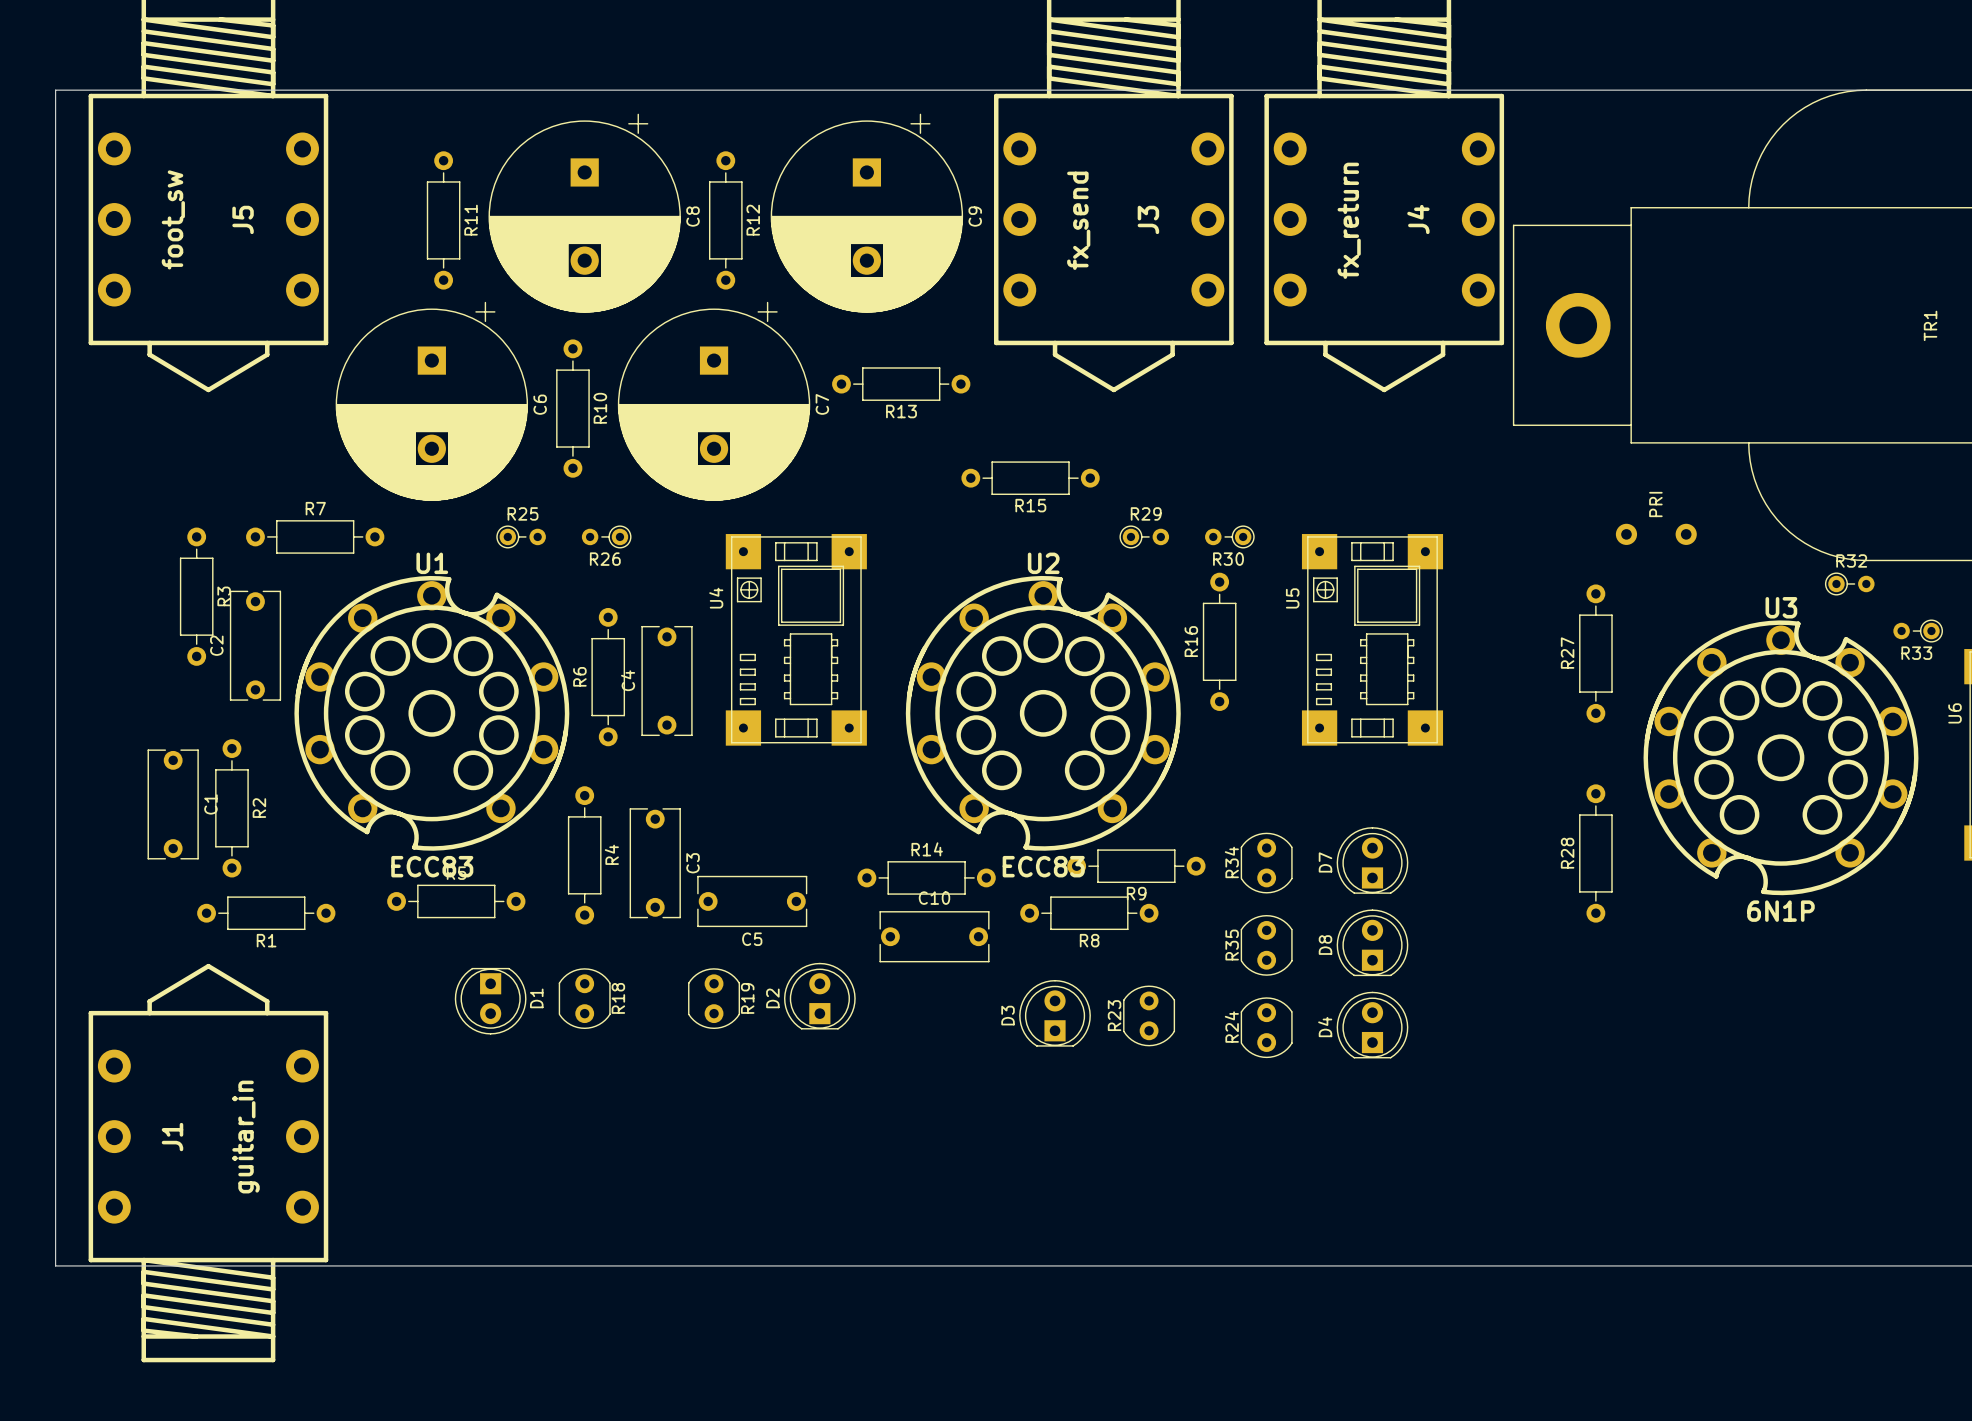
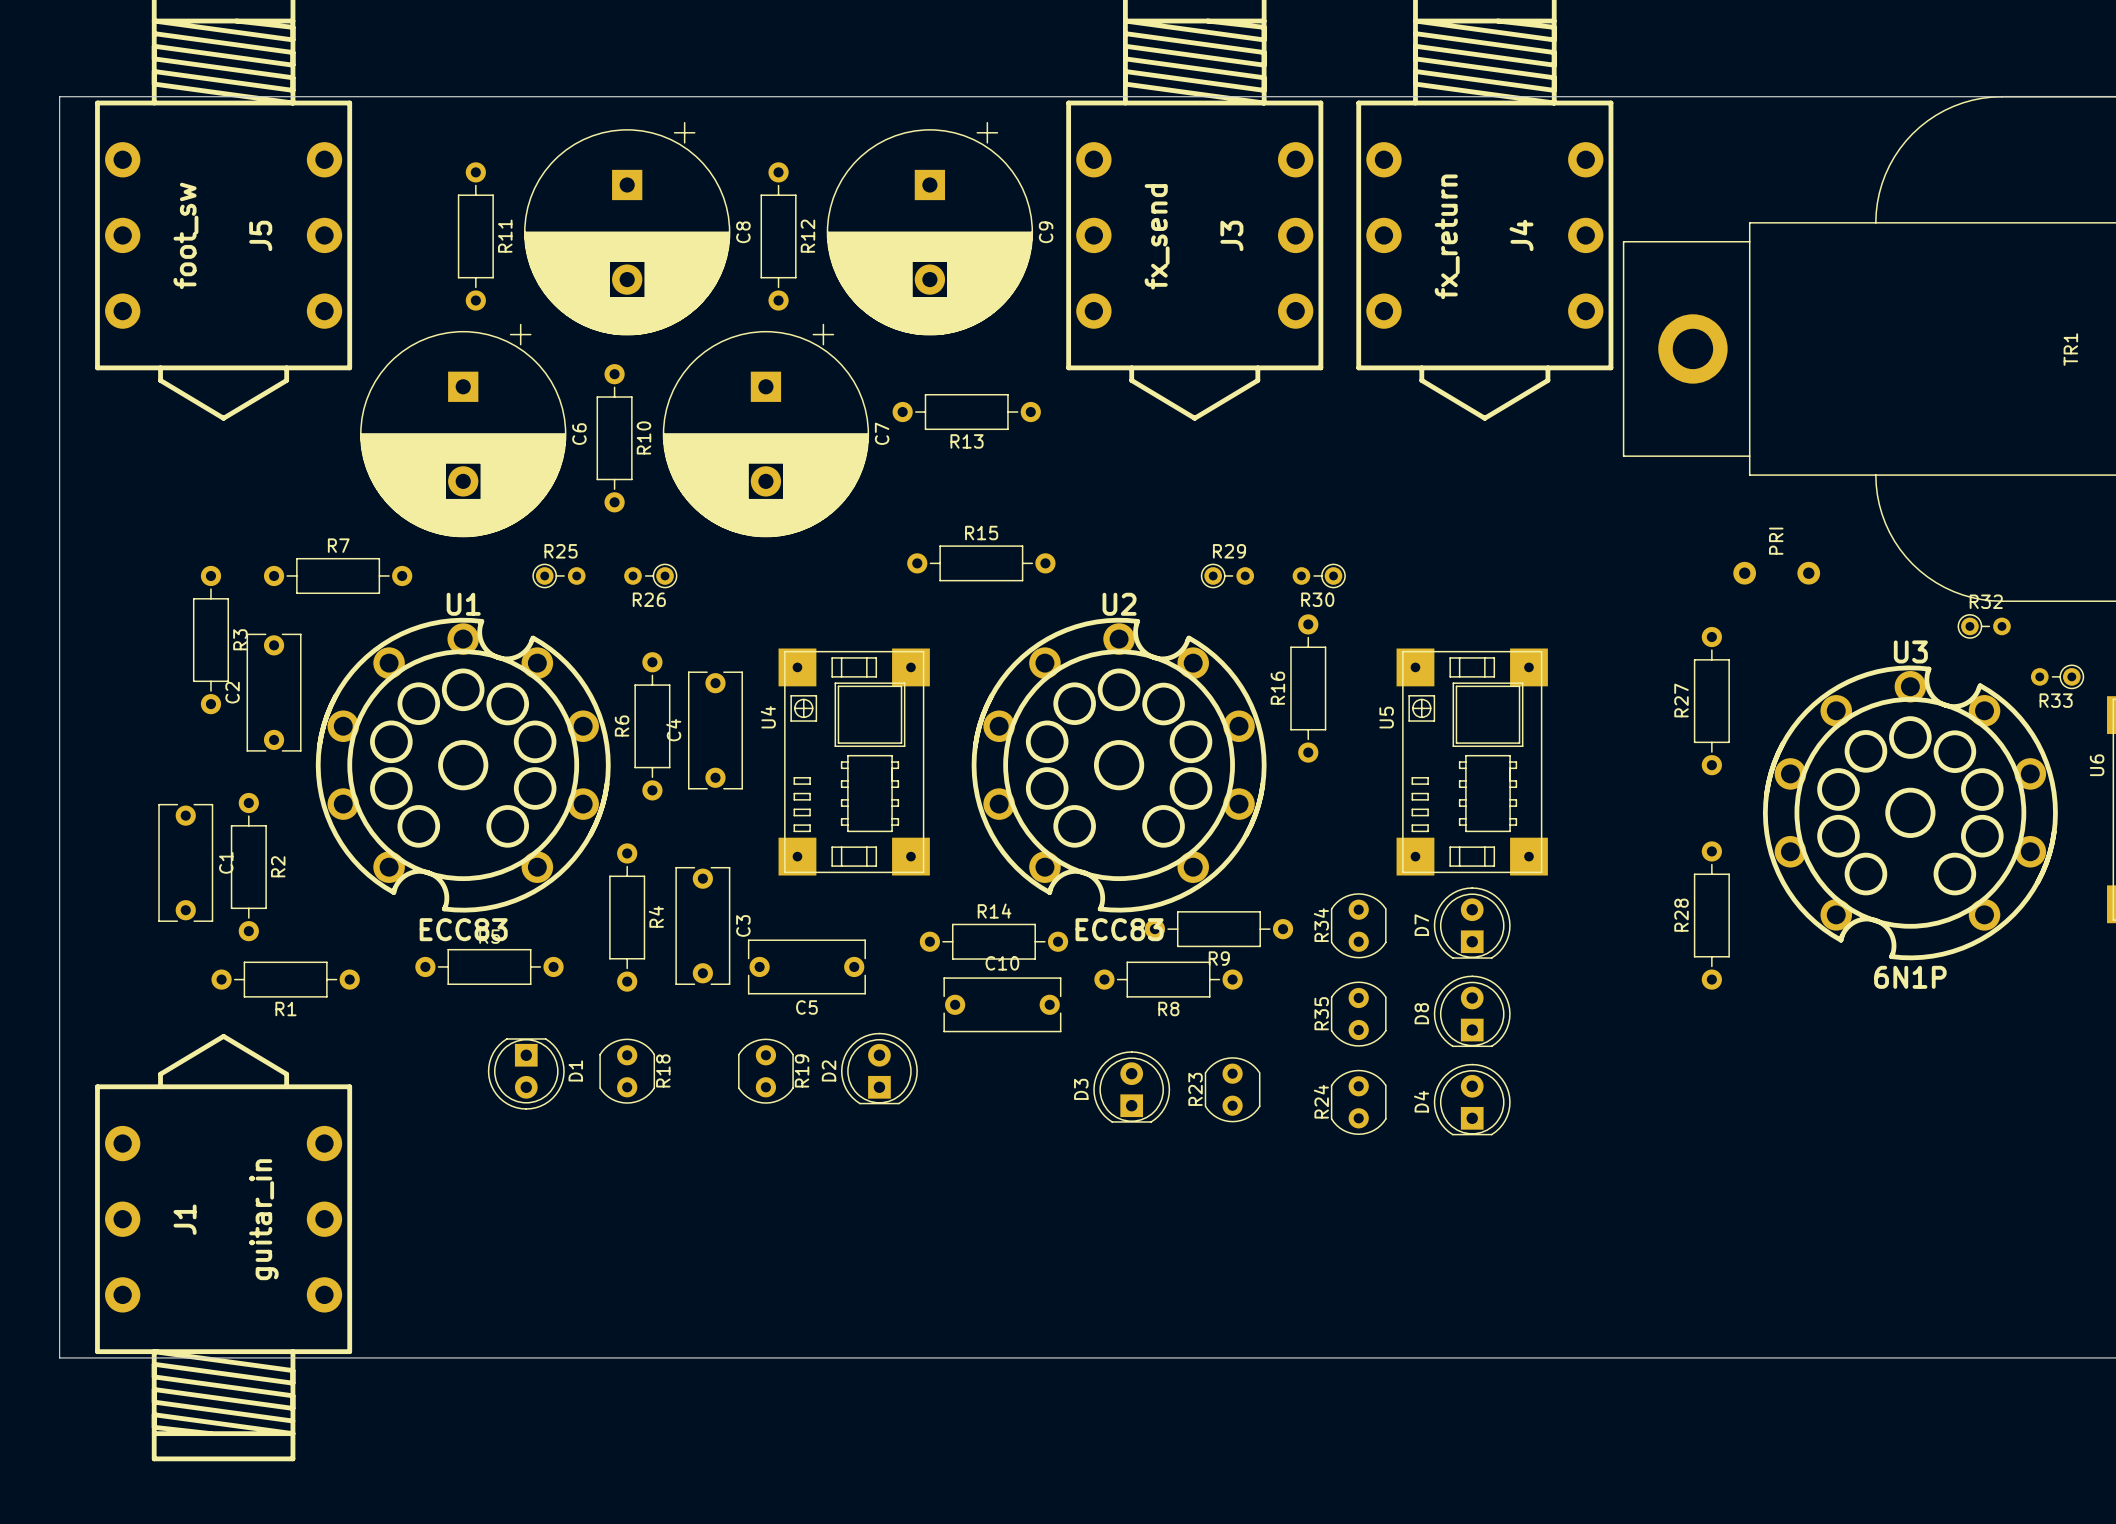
R15 position: (1030, 478) -> (981, 563)
R15 name position: R15 (1030, 505) -> R15 (981, 533)
U4 position: (796, 639) -> (854, 762)
U5 position: (1372, 639) -> (1472, 762)

